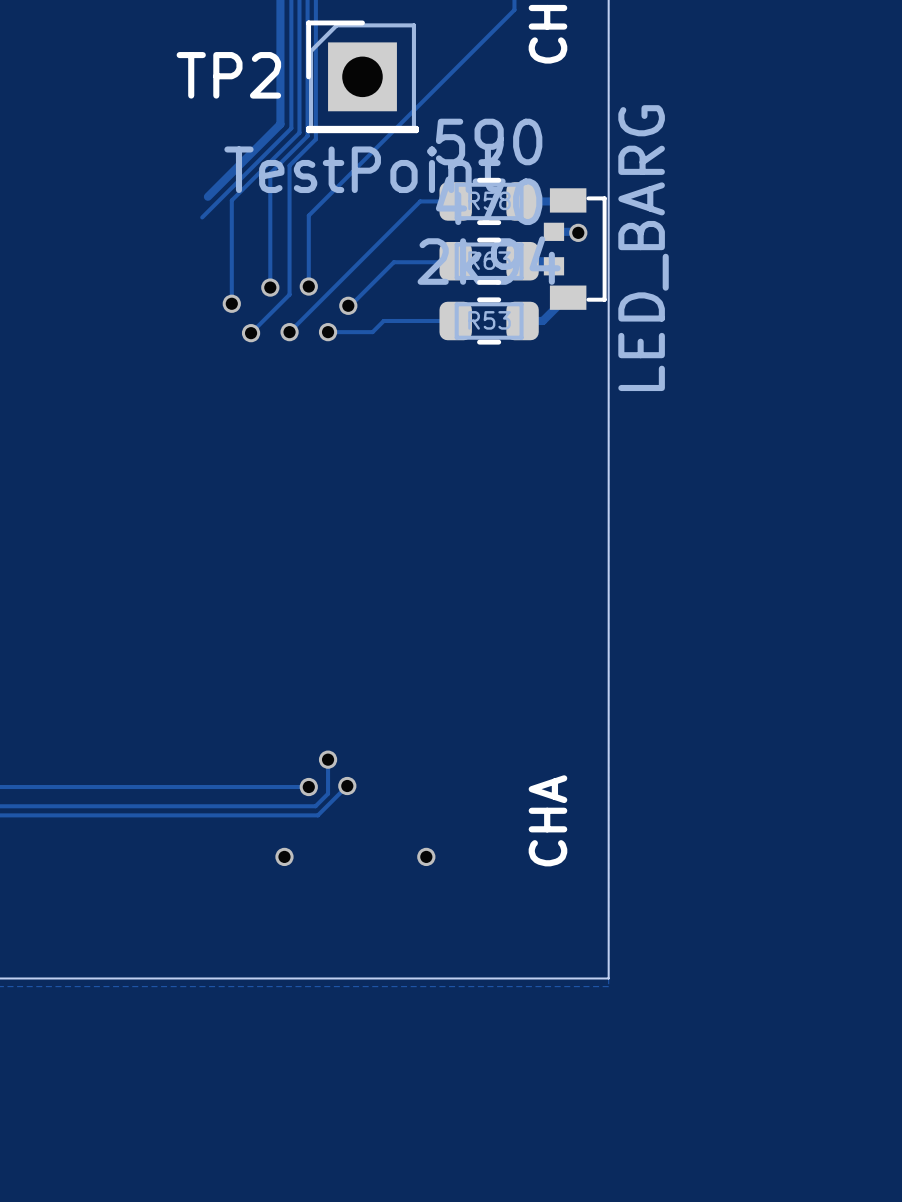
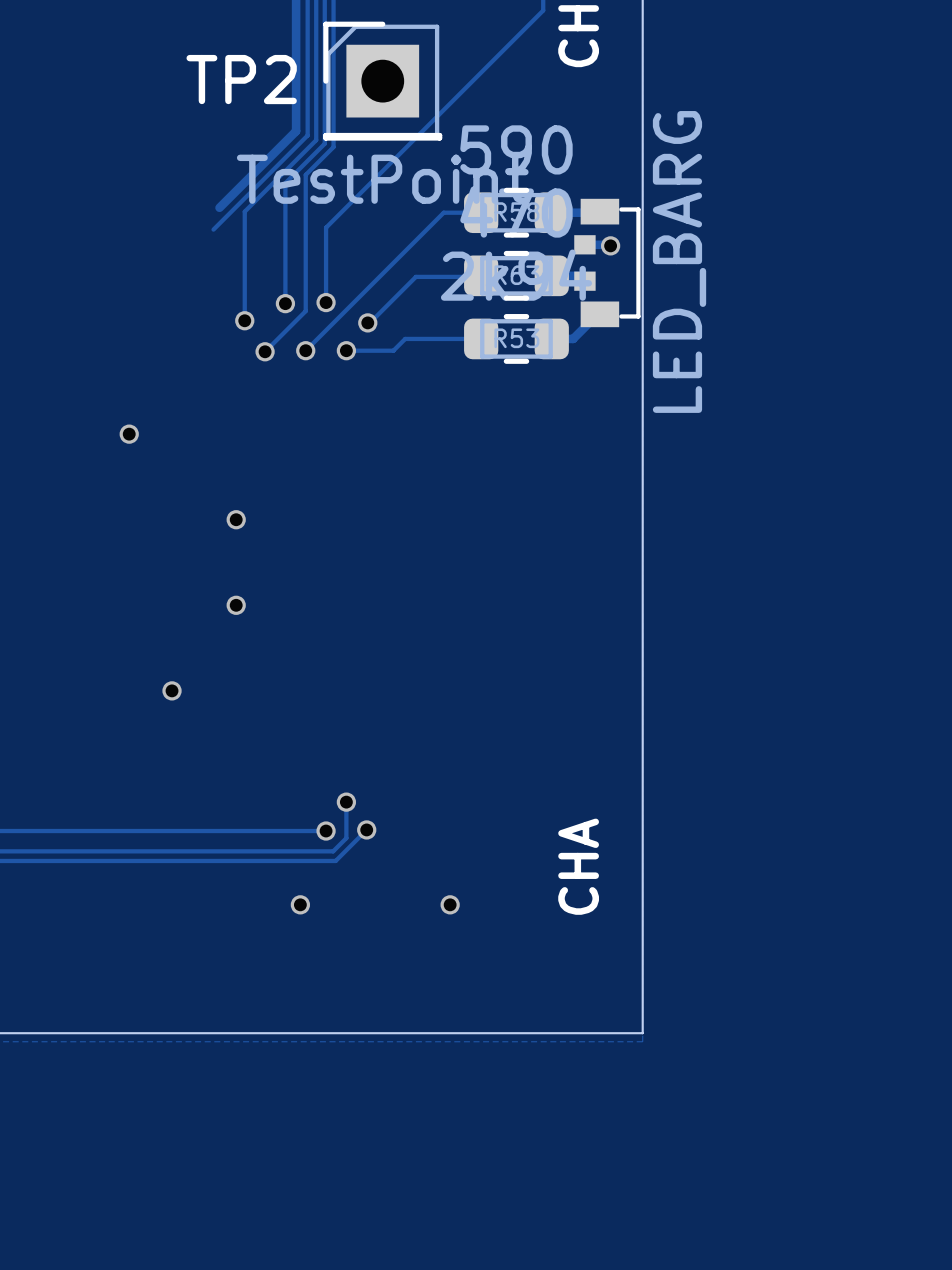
via: none -> (129, 434)
via: none -> (236, 519)
via: none -> (236, 605)
via: none -> (172, 690)

